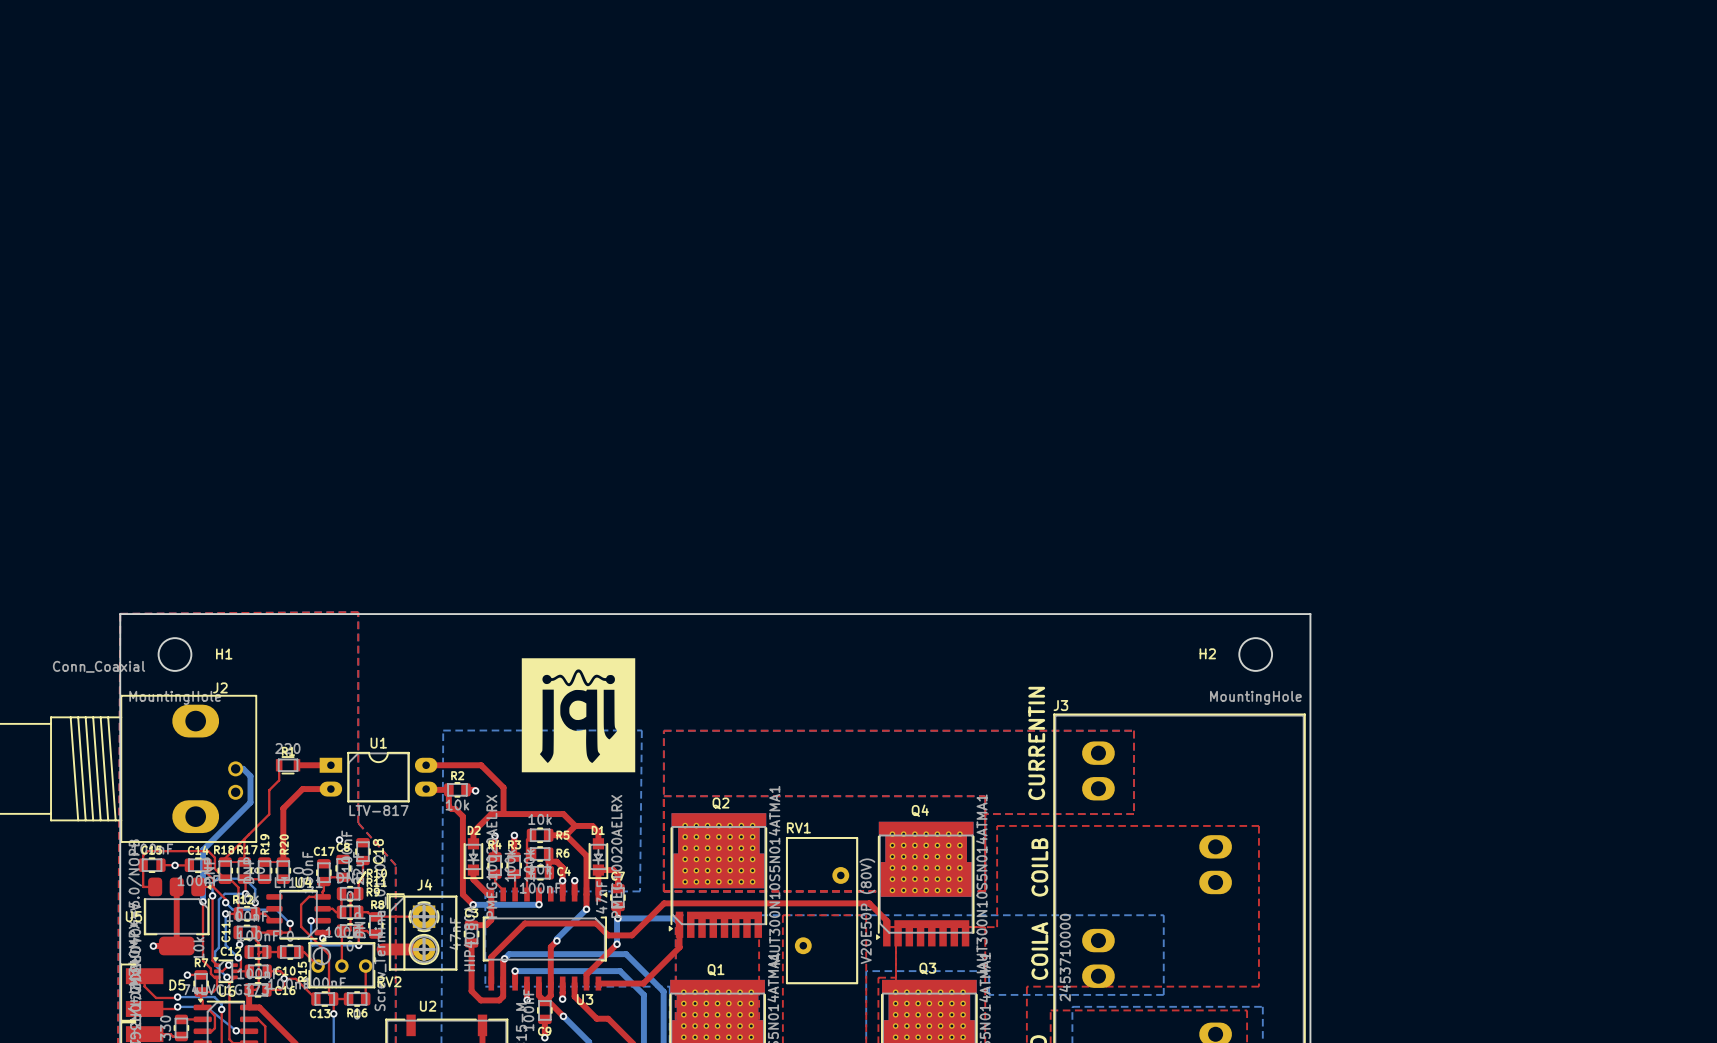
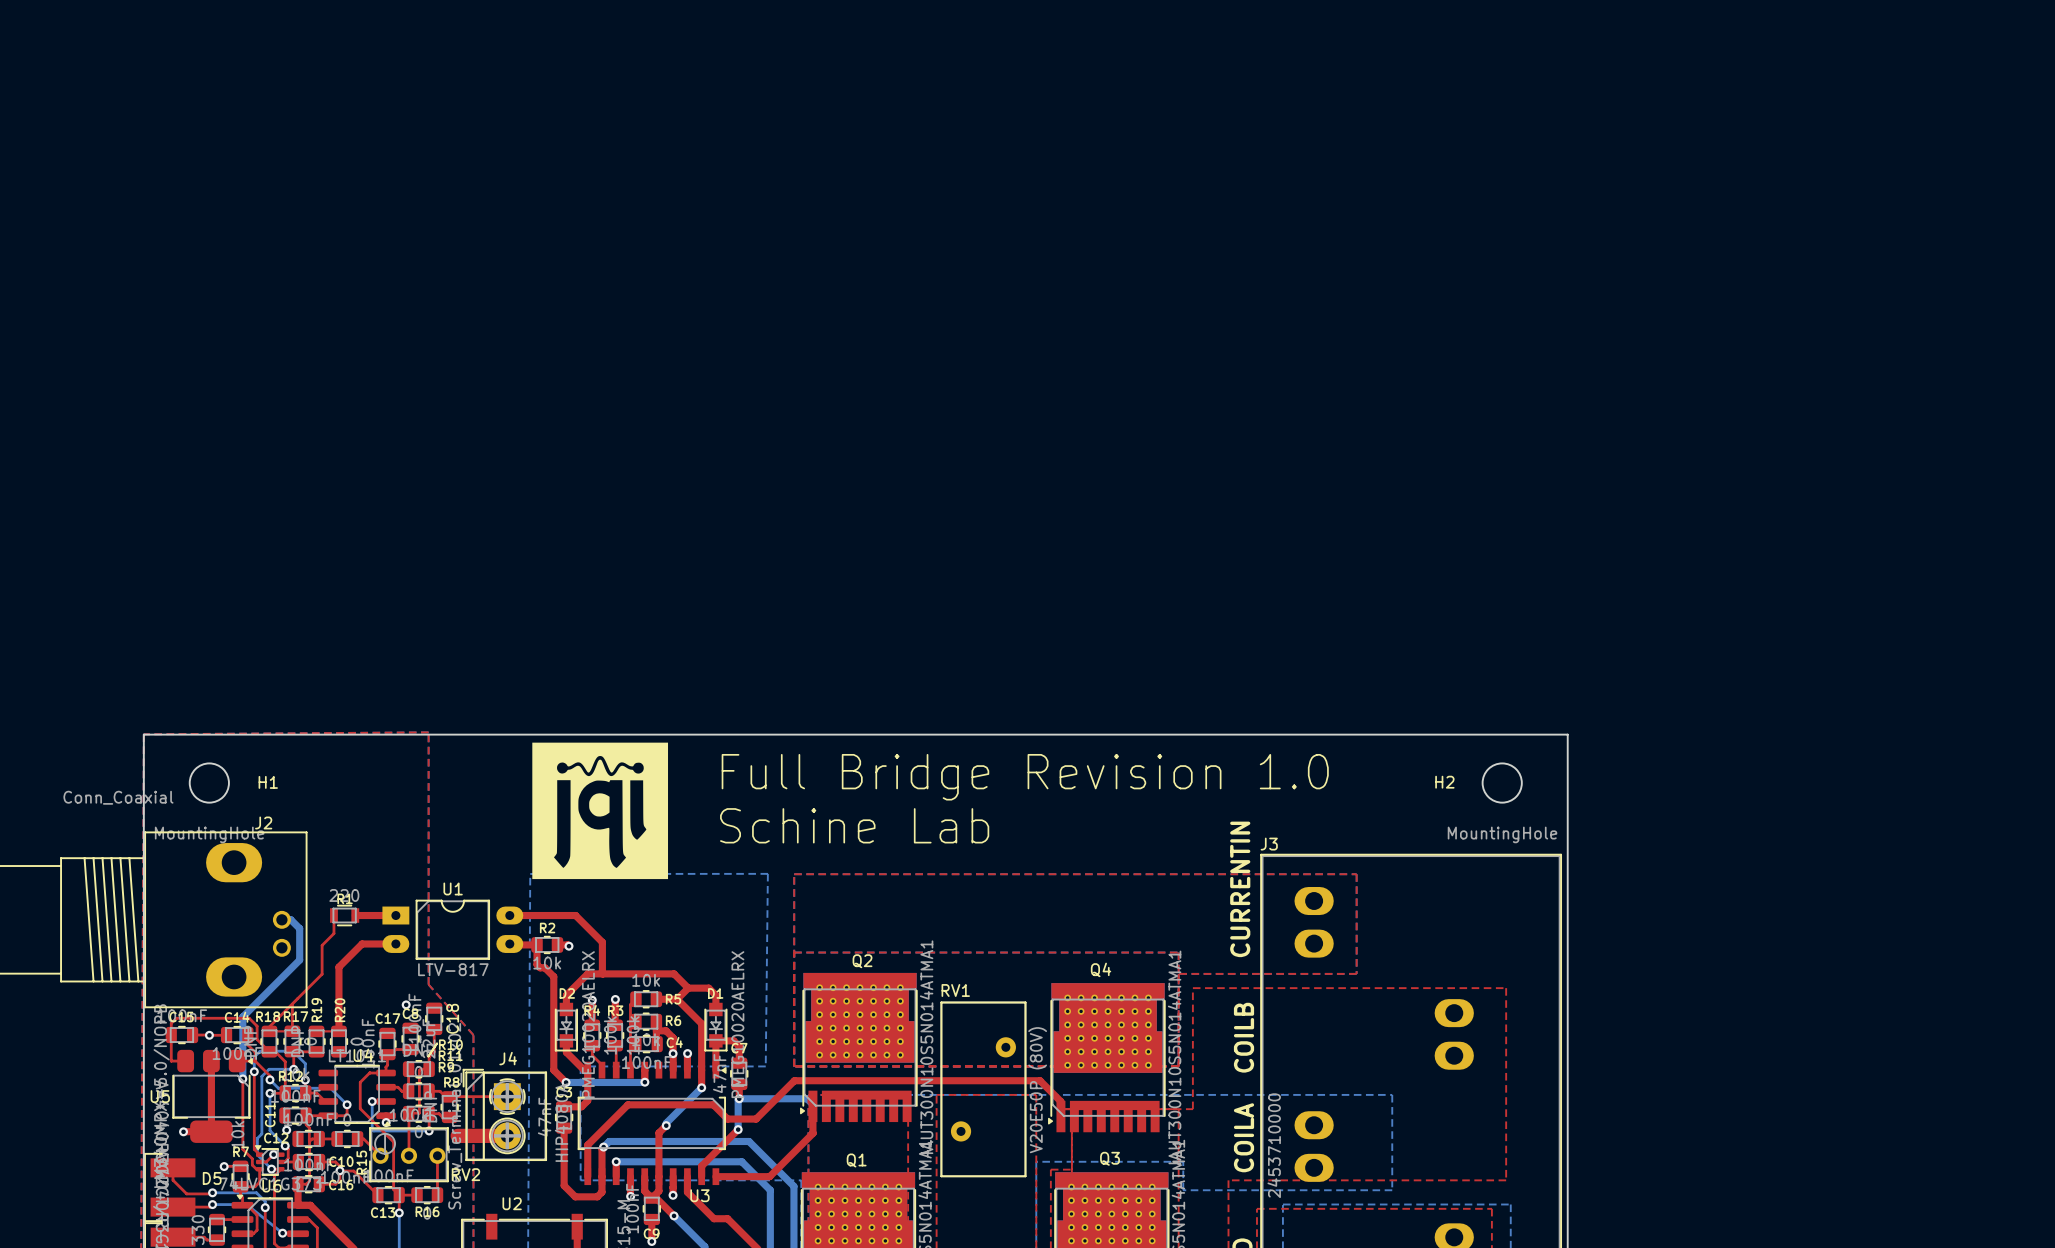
text: none -> Full Bridge Revision 1.0 (1025, 777)
text: none -> Schine Lab (854, 825)
drawing position: (578, 715) -> (600, 810)

